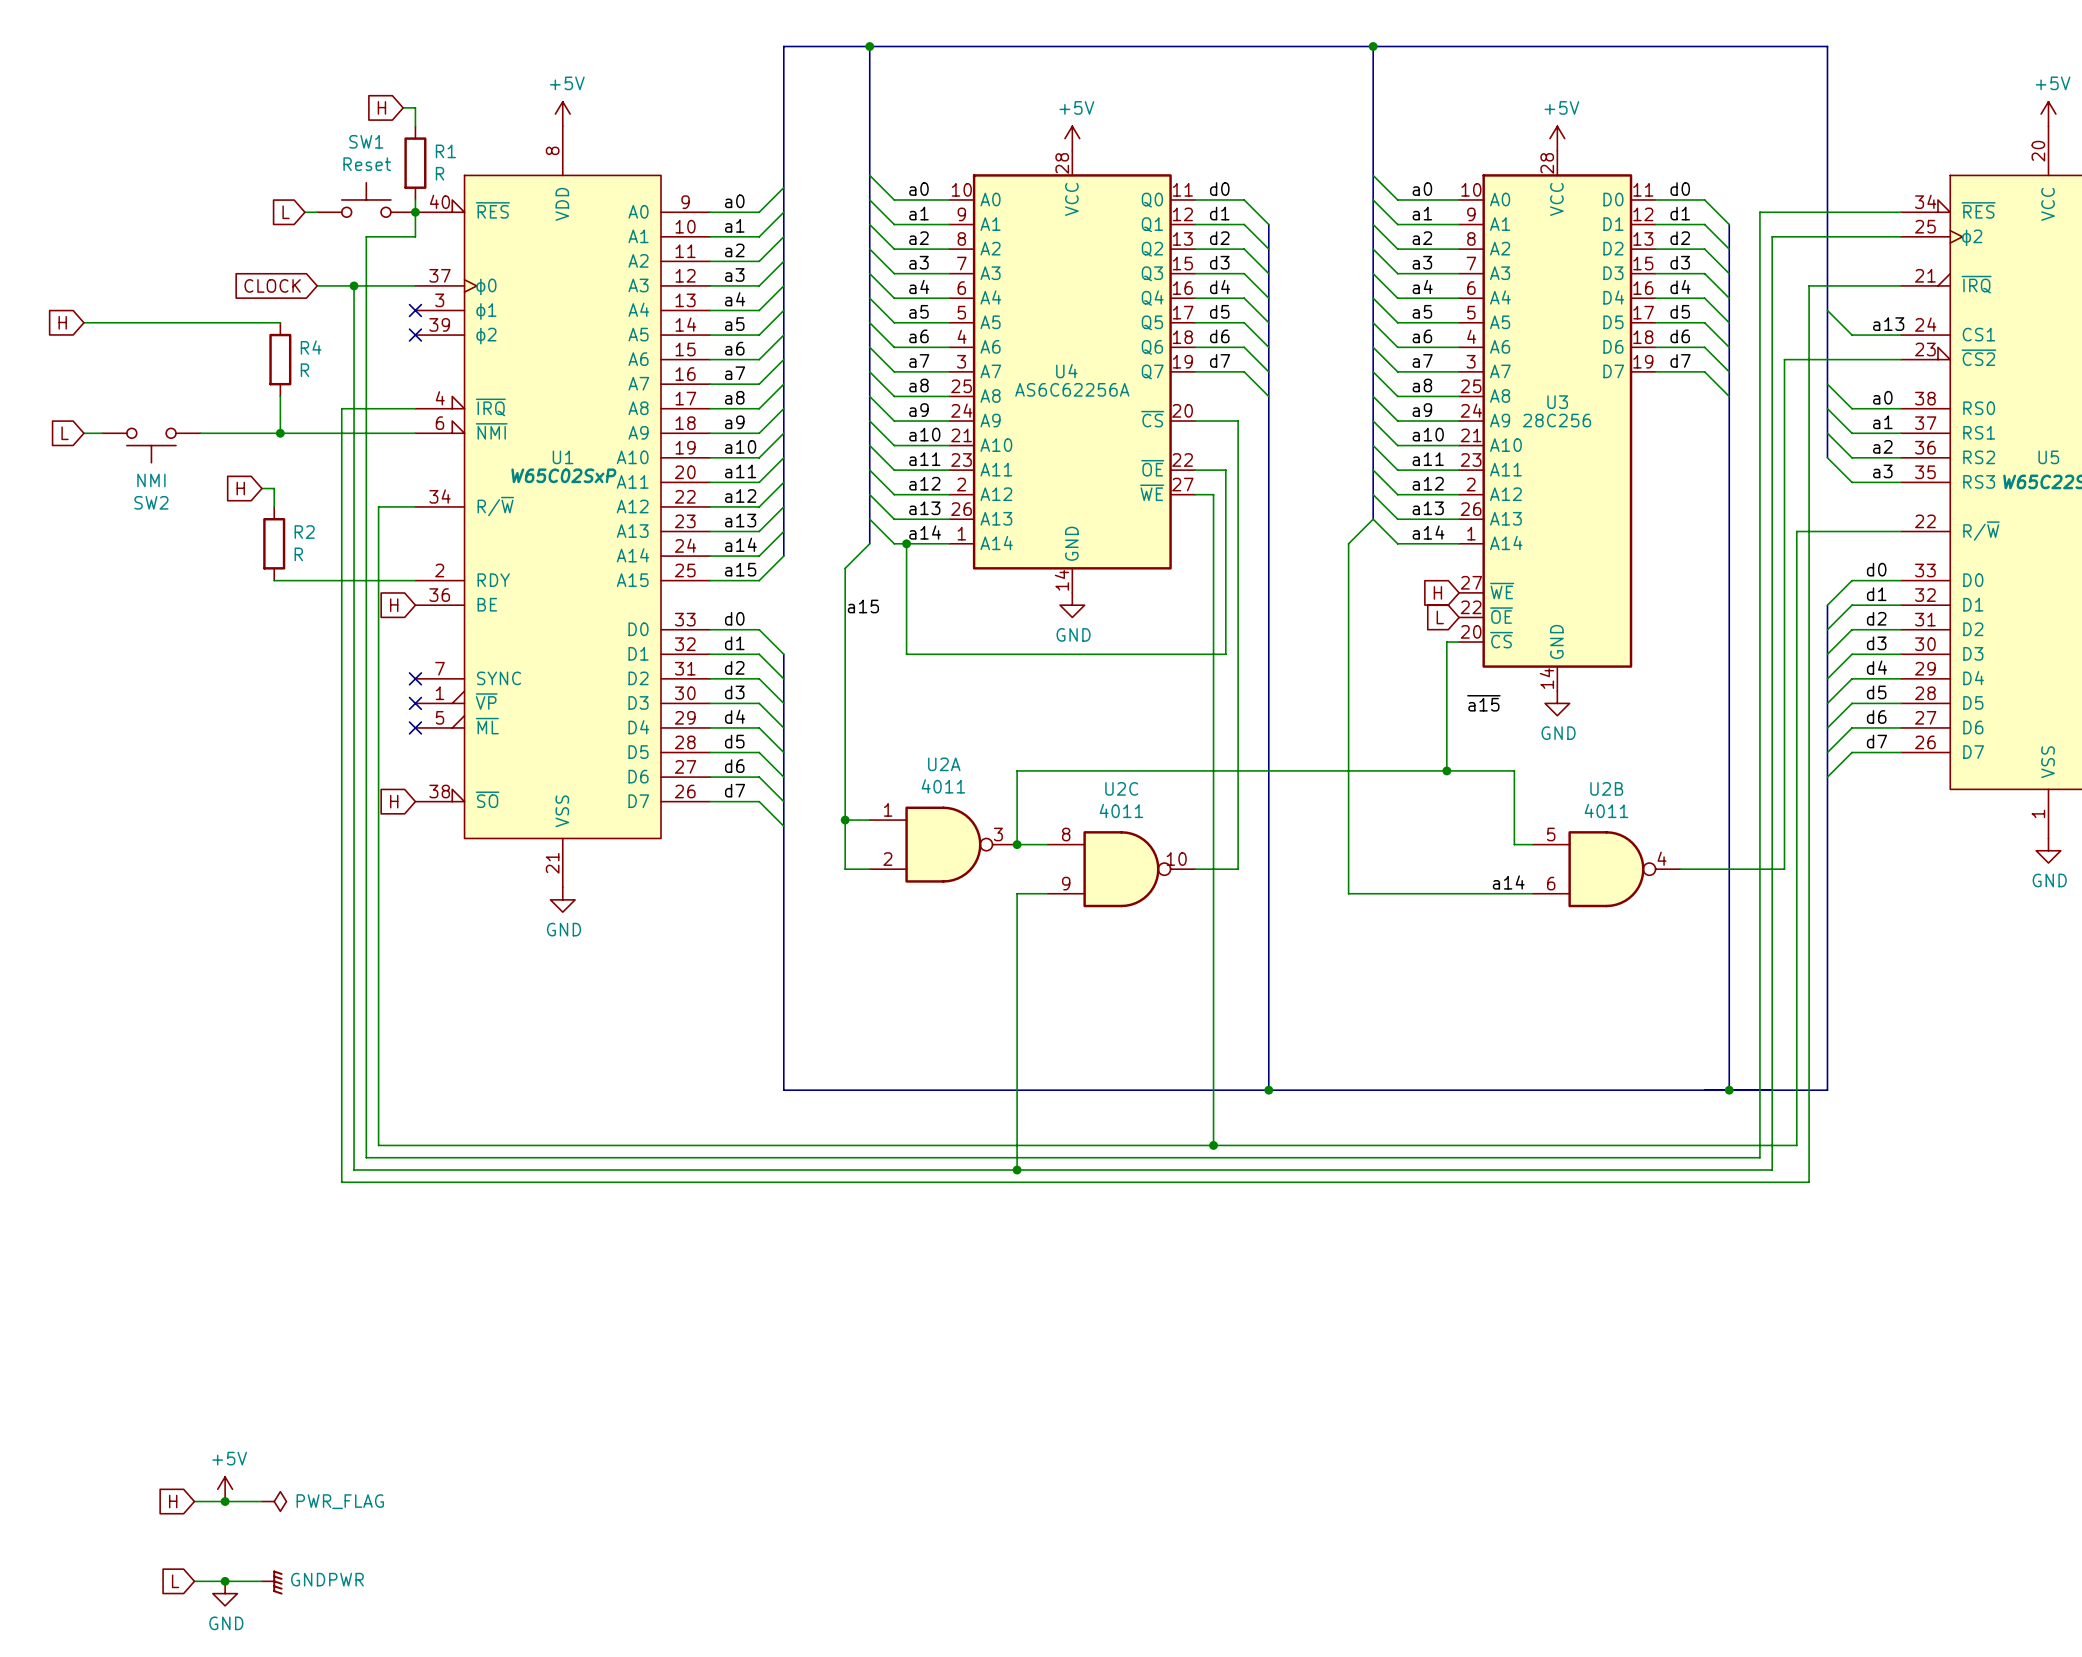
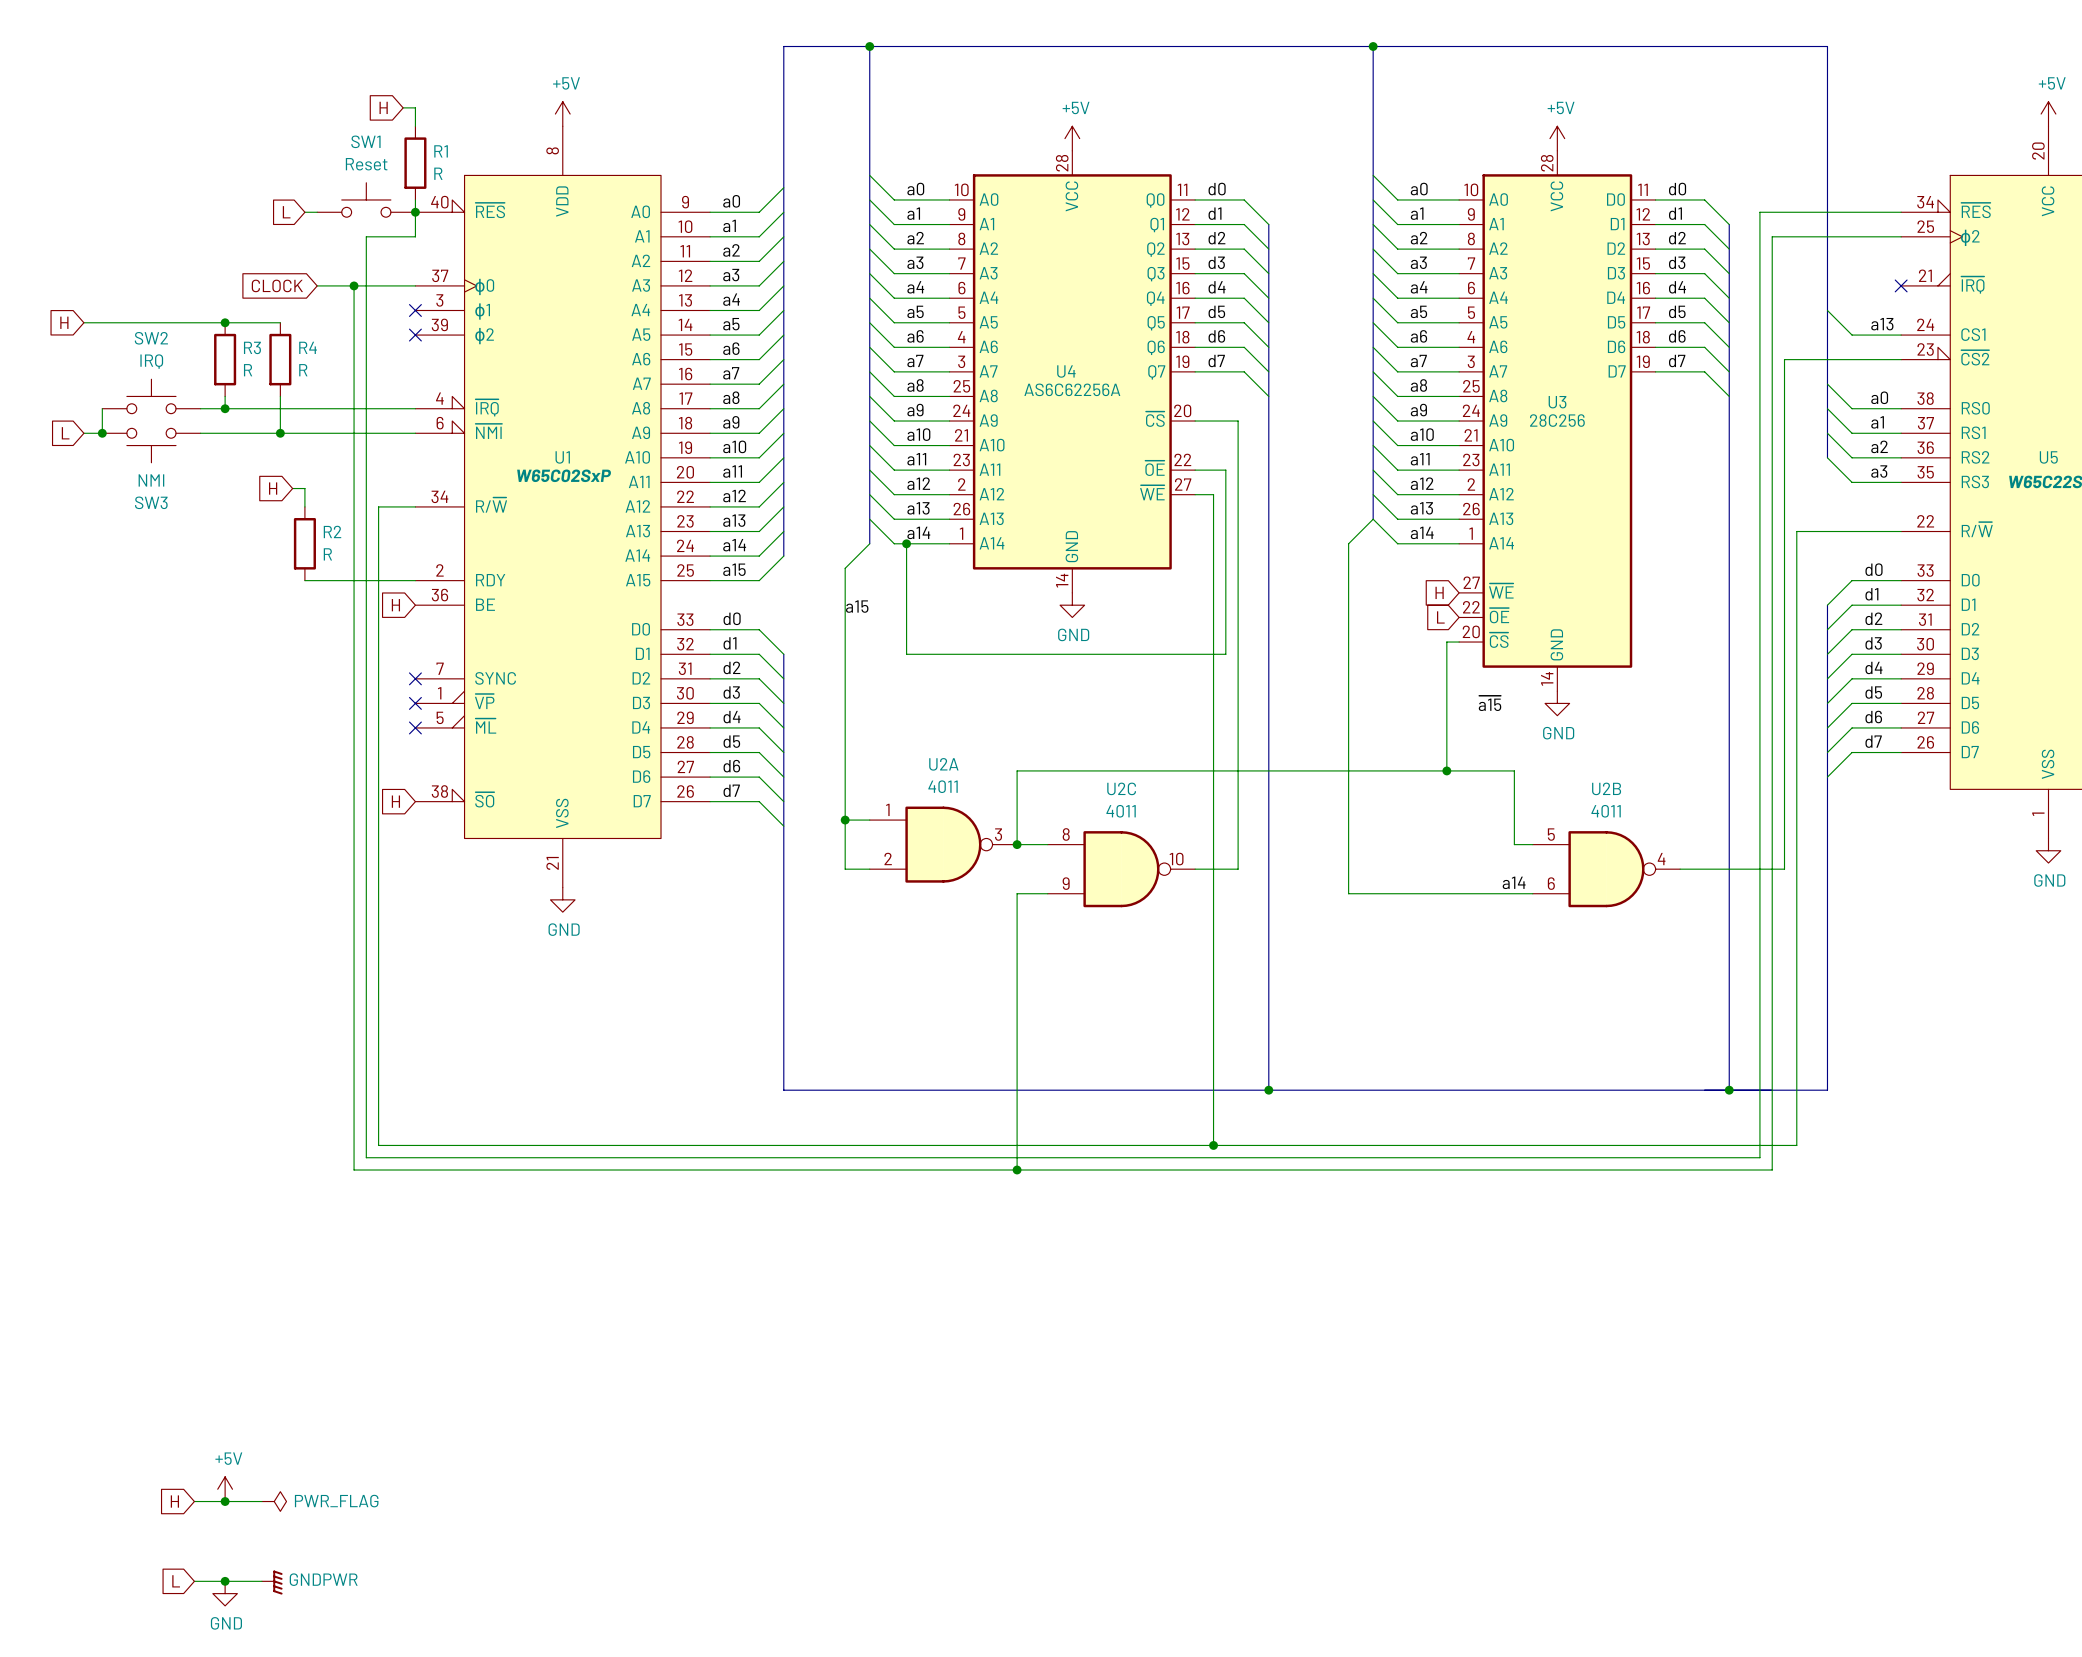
wire: (1901, 285) (1809, 285) (1809, 1182) (341, 1182) (341, 408) -> (200, 408) (341, 408)
no-connect mark: none -> (1901, 285)
junction: none -> (225, 322)
R3: none -> R (225, 359)
SW2: none -> IRQ (151, 396)
wire: none -> (225, 396) (225, 408)
wire: none -> (102, 408) (102, 433)
junction: none -> (225, 408)
junction: none -> (102, 433)
global label position: H (240, 488) -> H (273, 488)
wire: (261, 488) (274, 488) (274, 506) -> (292, 488) (304, 488) (304, 506)
SW2 name: SW2 (151, 502) -> SW3 (151, 502)
R2 position: (274, 543) -> (304, 543)
wire: (274, 580) (304, 580) -> none

